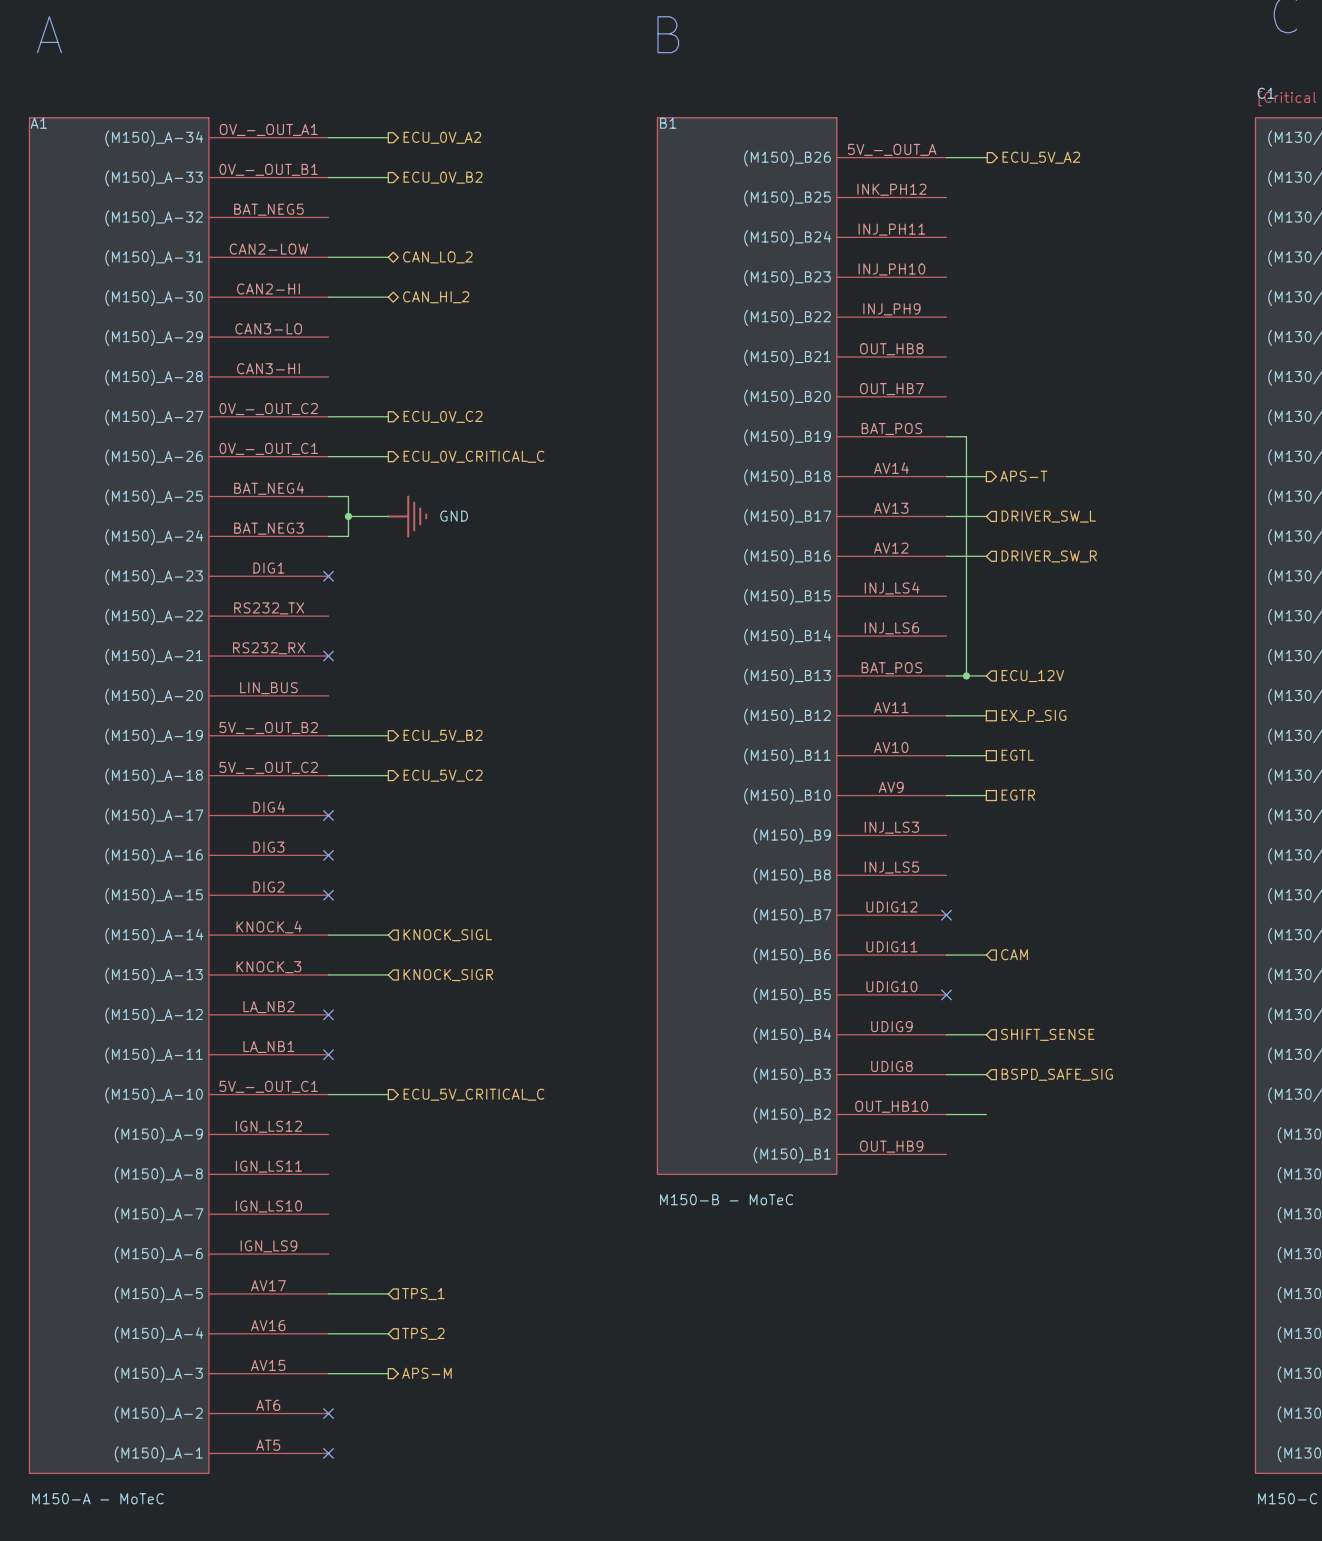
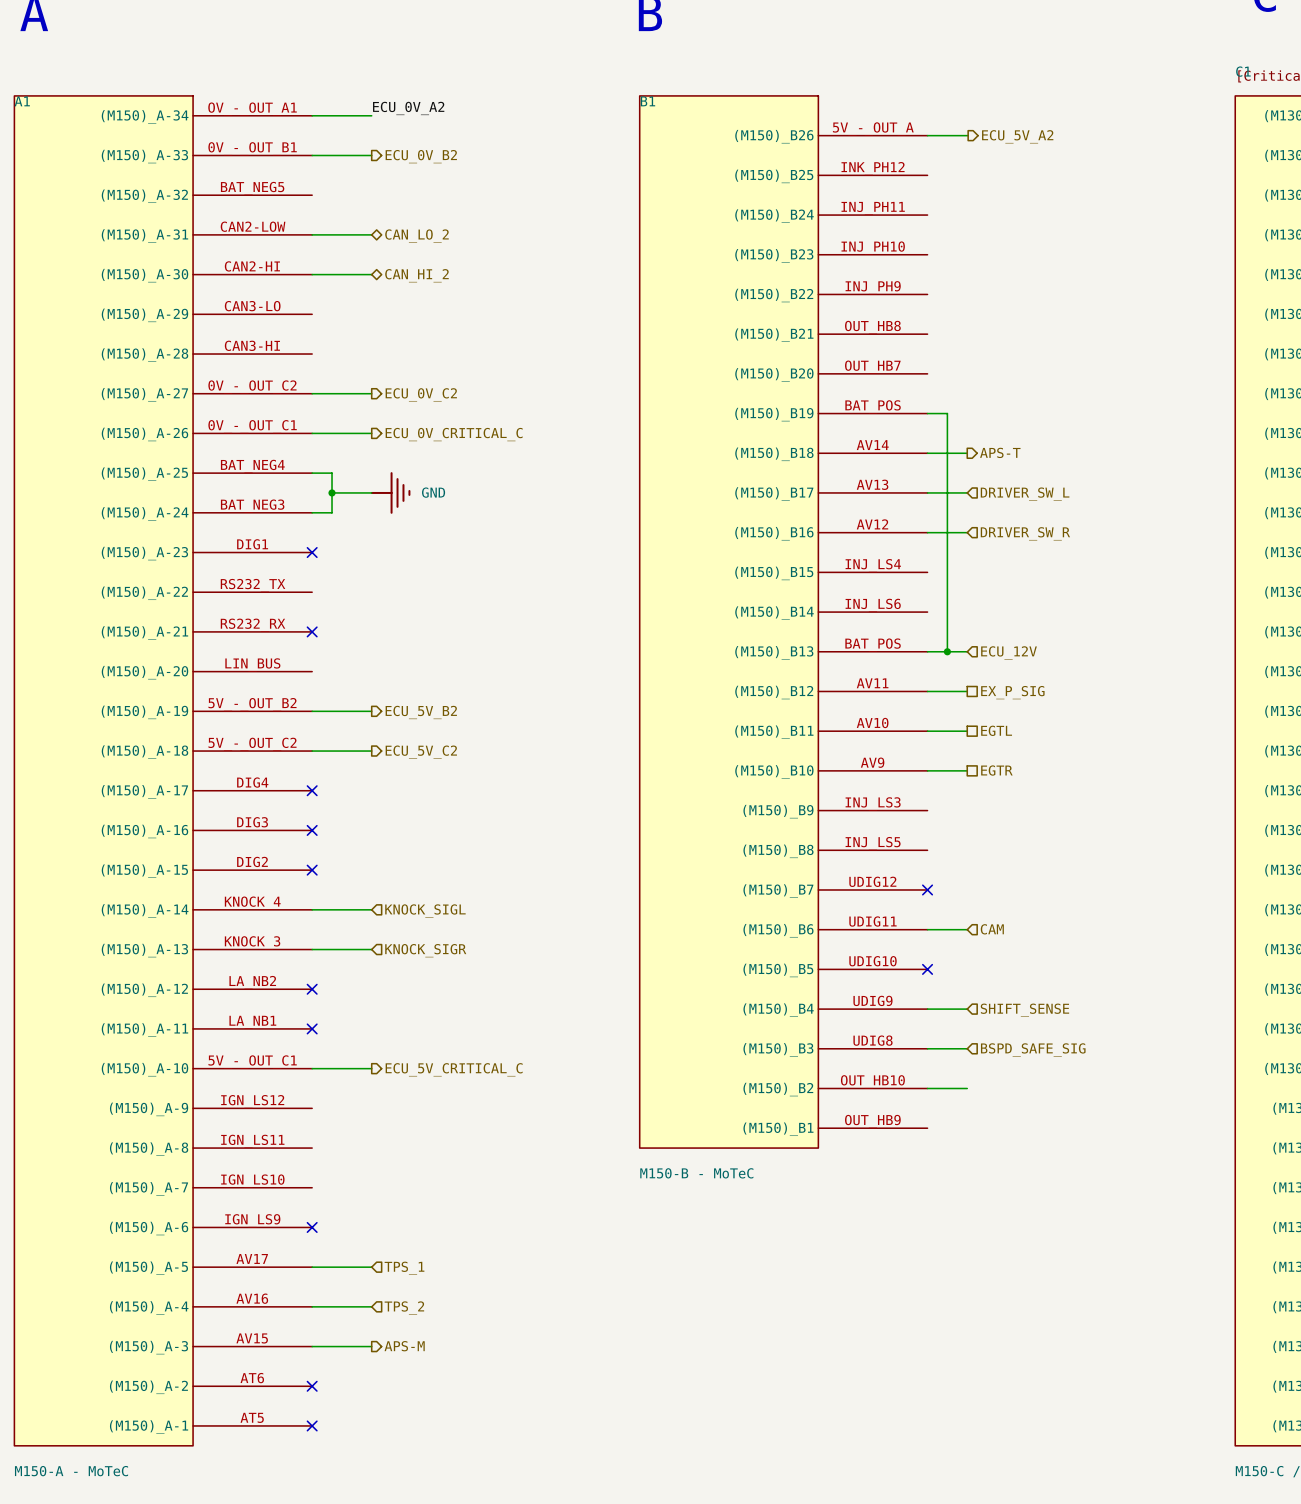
label: none -> ECU_0V_A2 (408, 108)
hierarchical label: ECU_0V_A2 (442, 137) -> none
no-connect mark: none -> (312, 1227)

